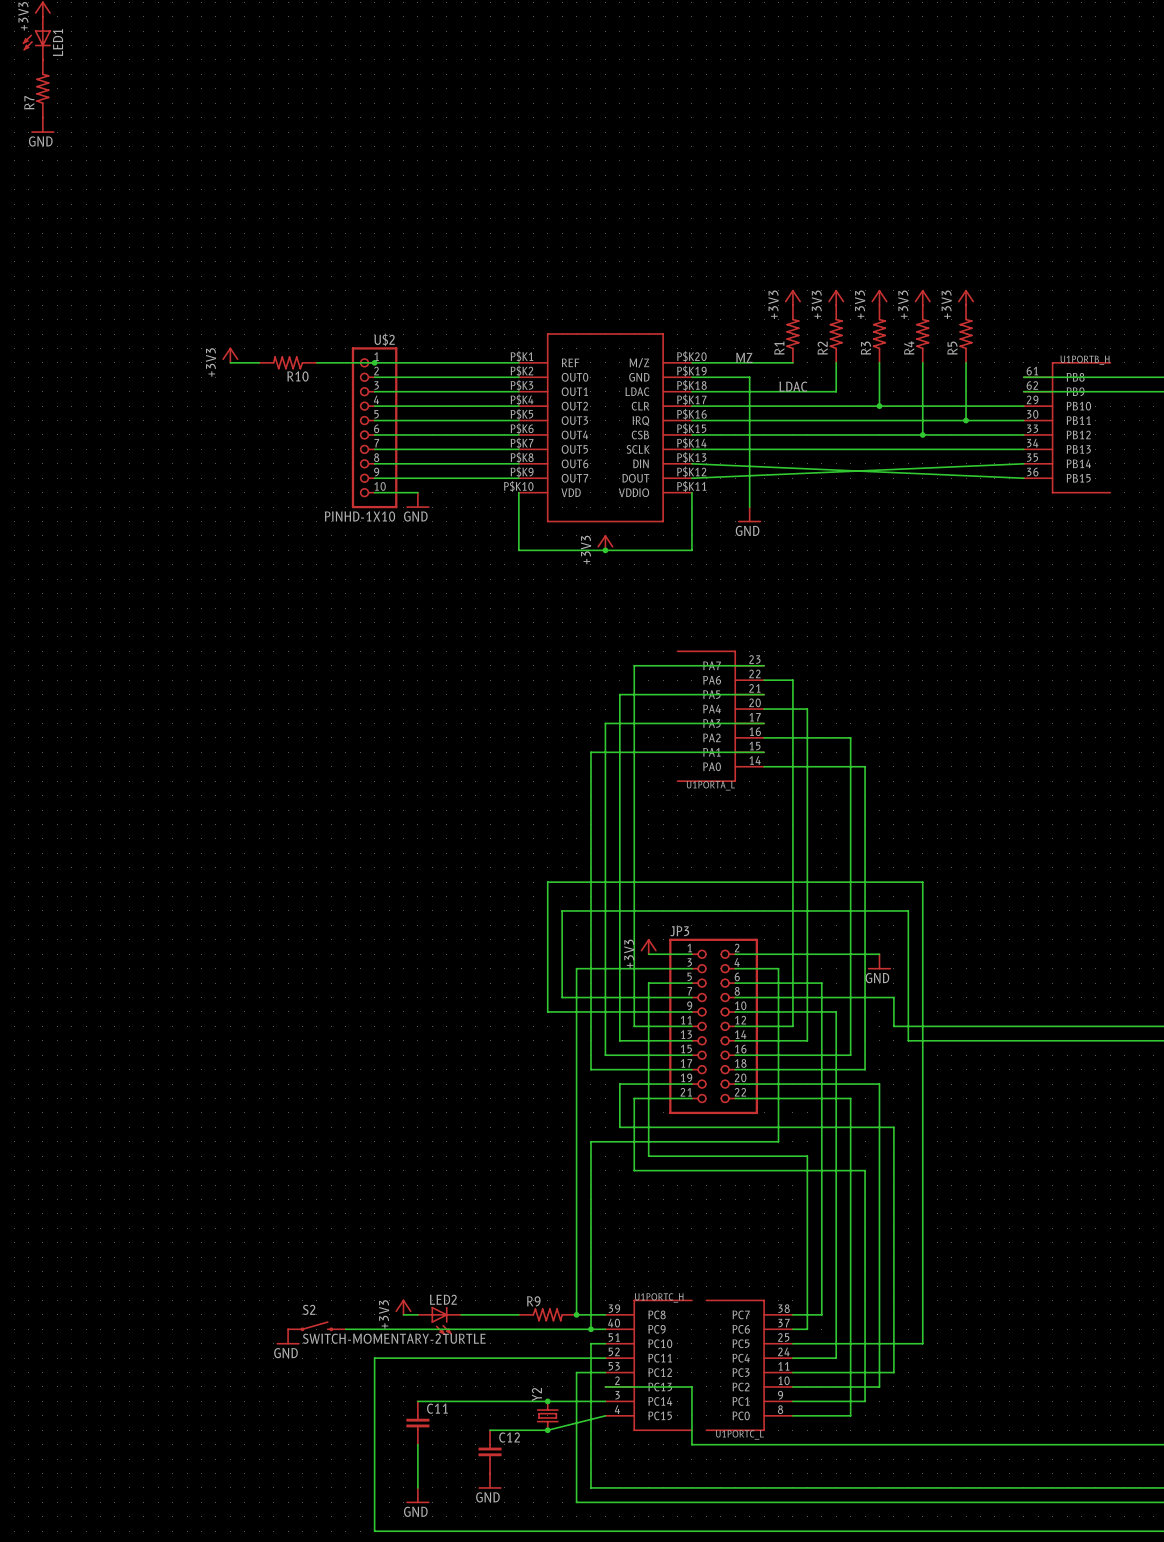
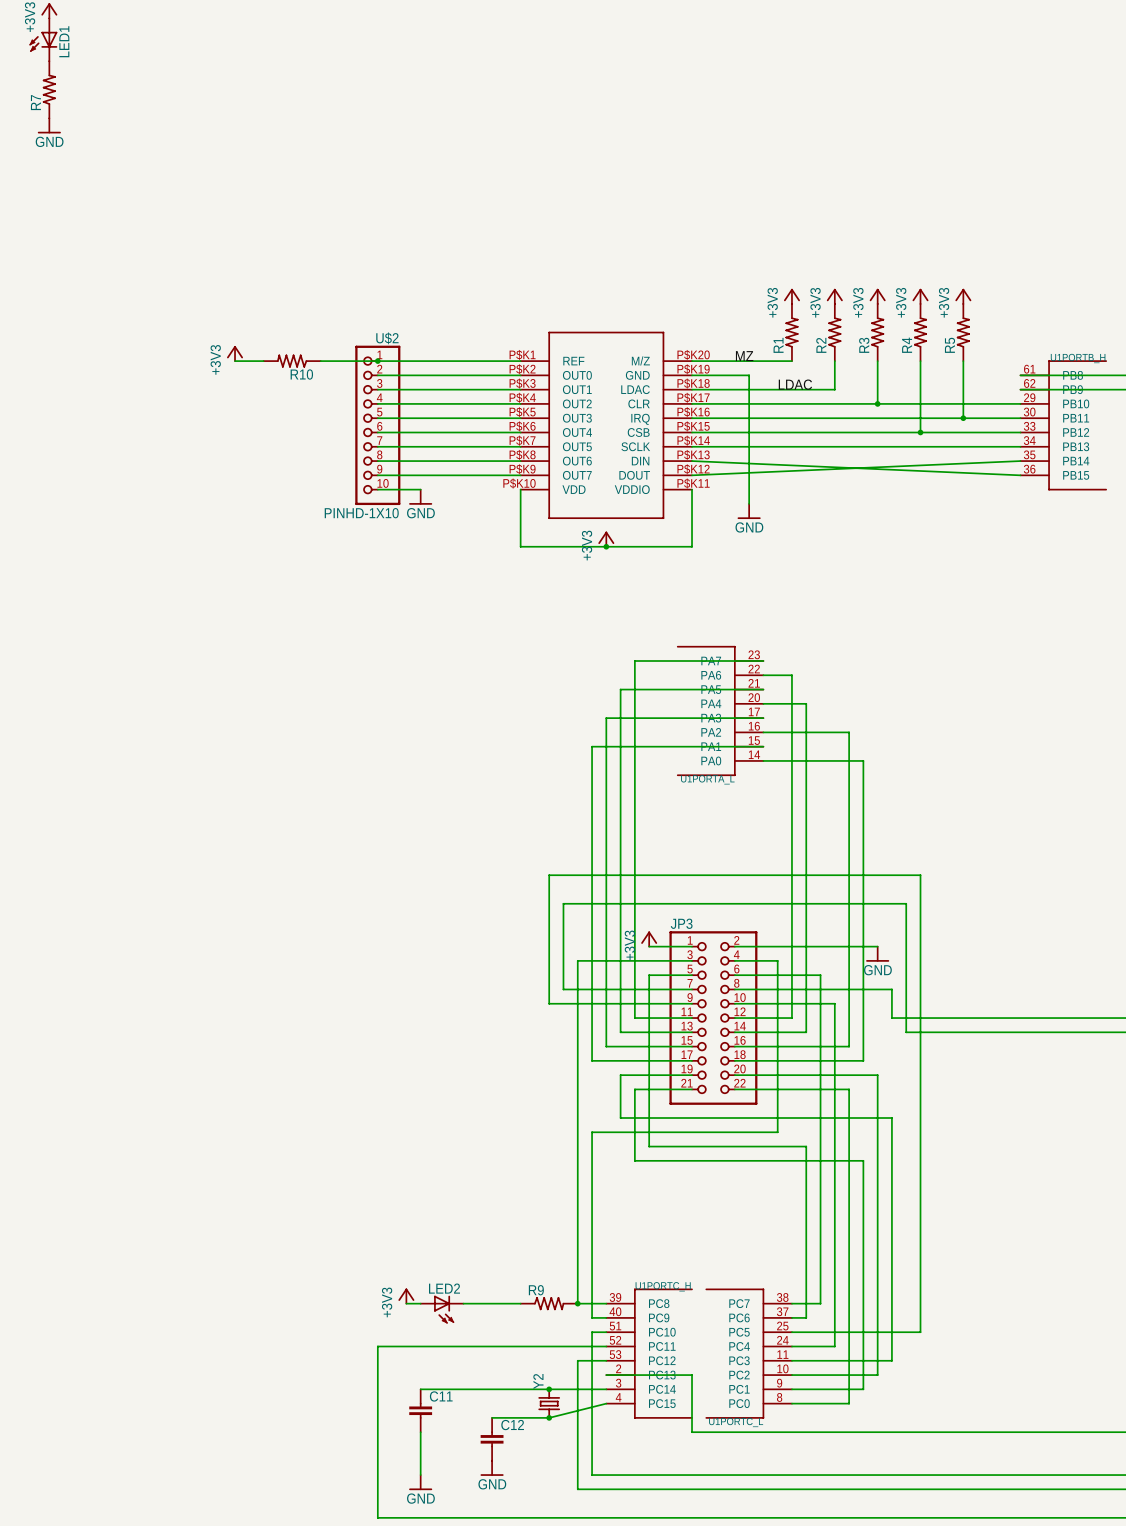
S2: SWITCH-MOMENTARY-2TURTLE (316, 1326) -> none
wire: (345, 1329) (590, 1329) -> none
junction: (590, 1329) -> none
power symbol: GND (288, 1336) -> none

